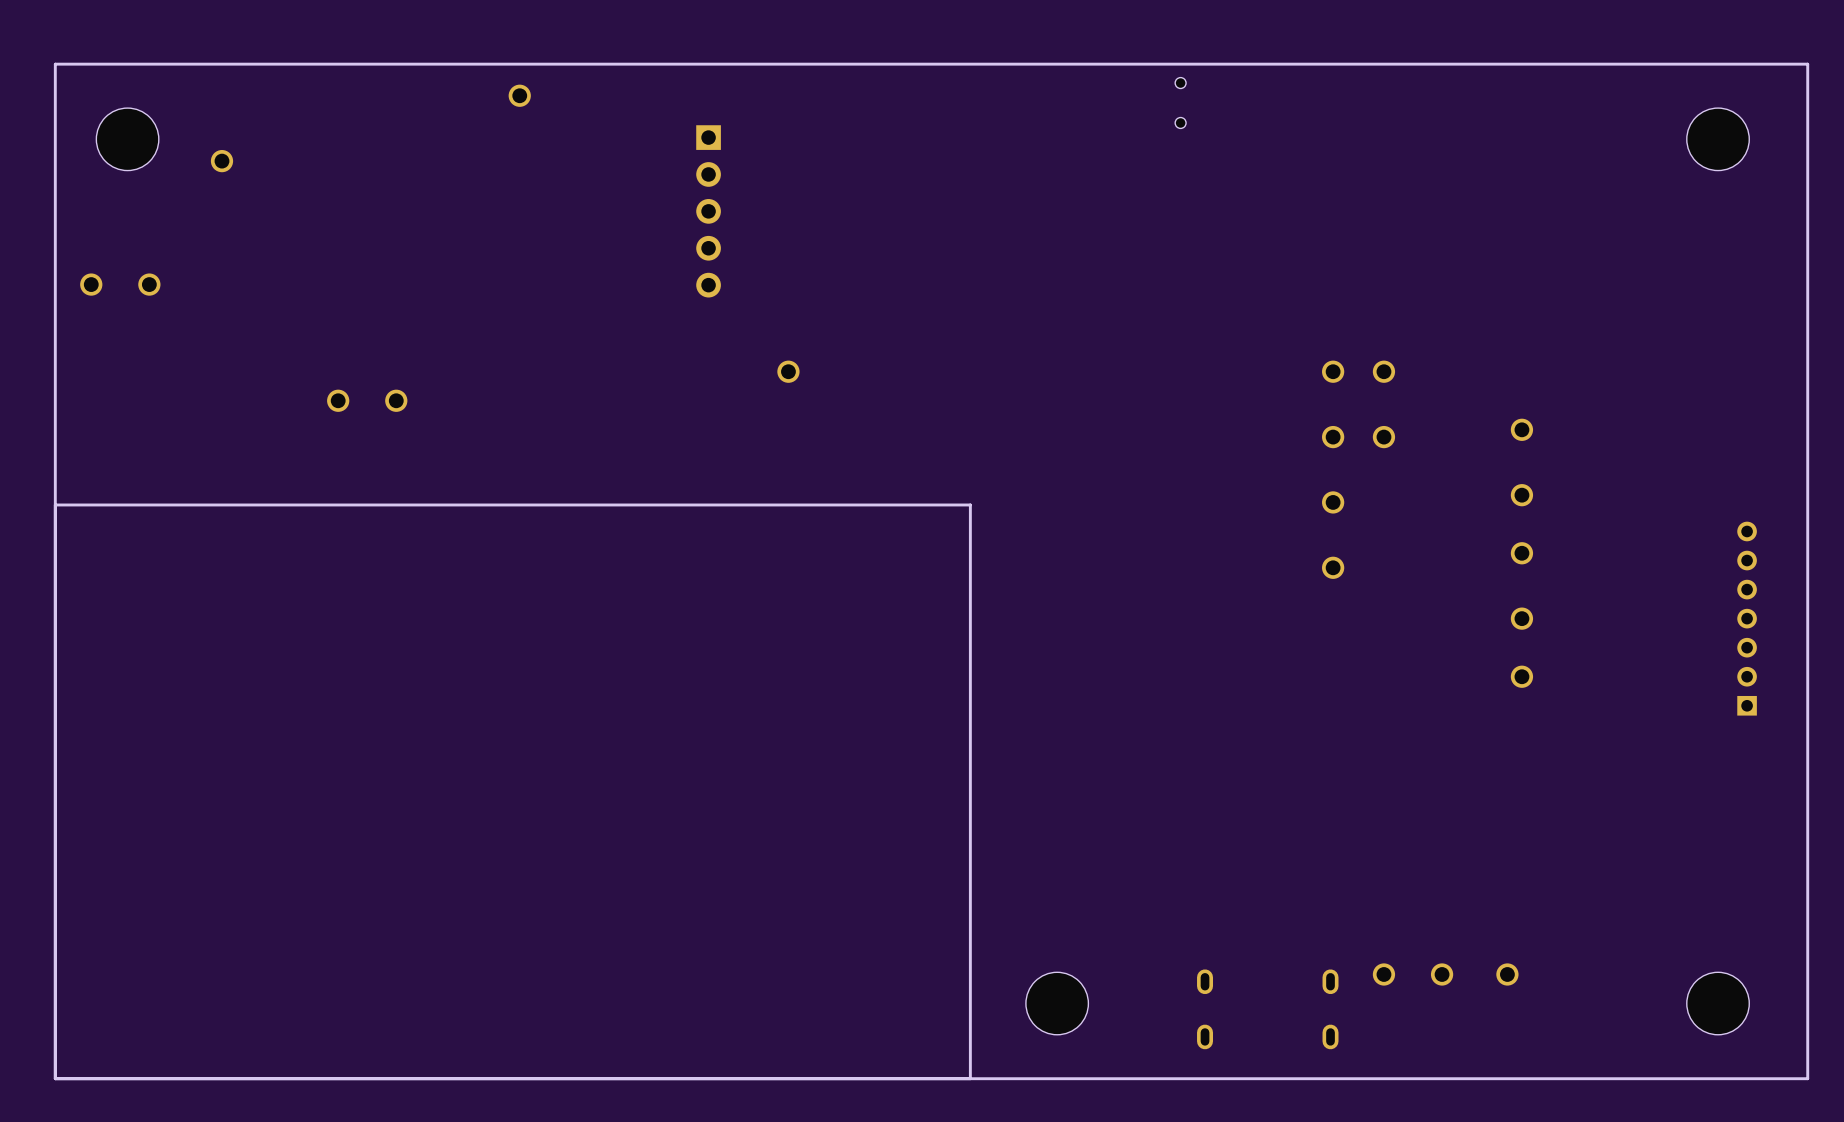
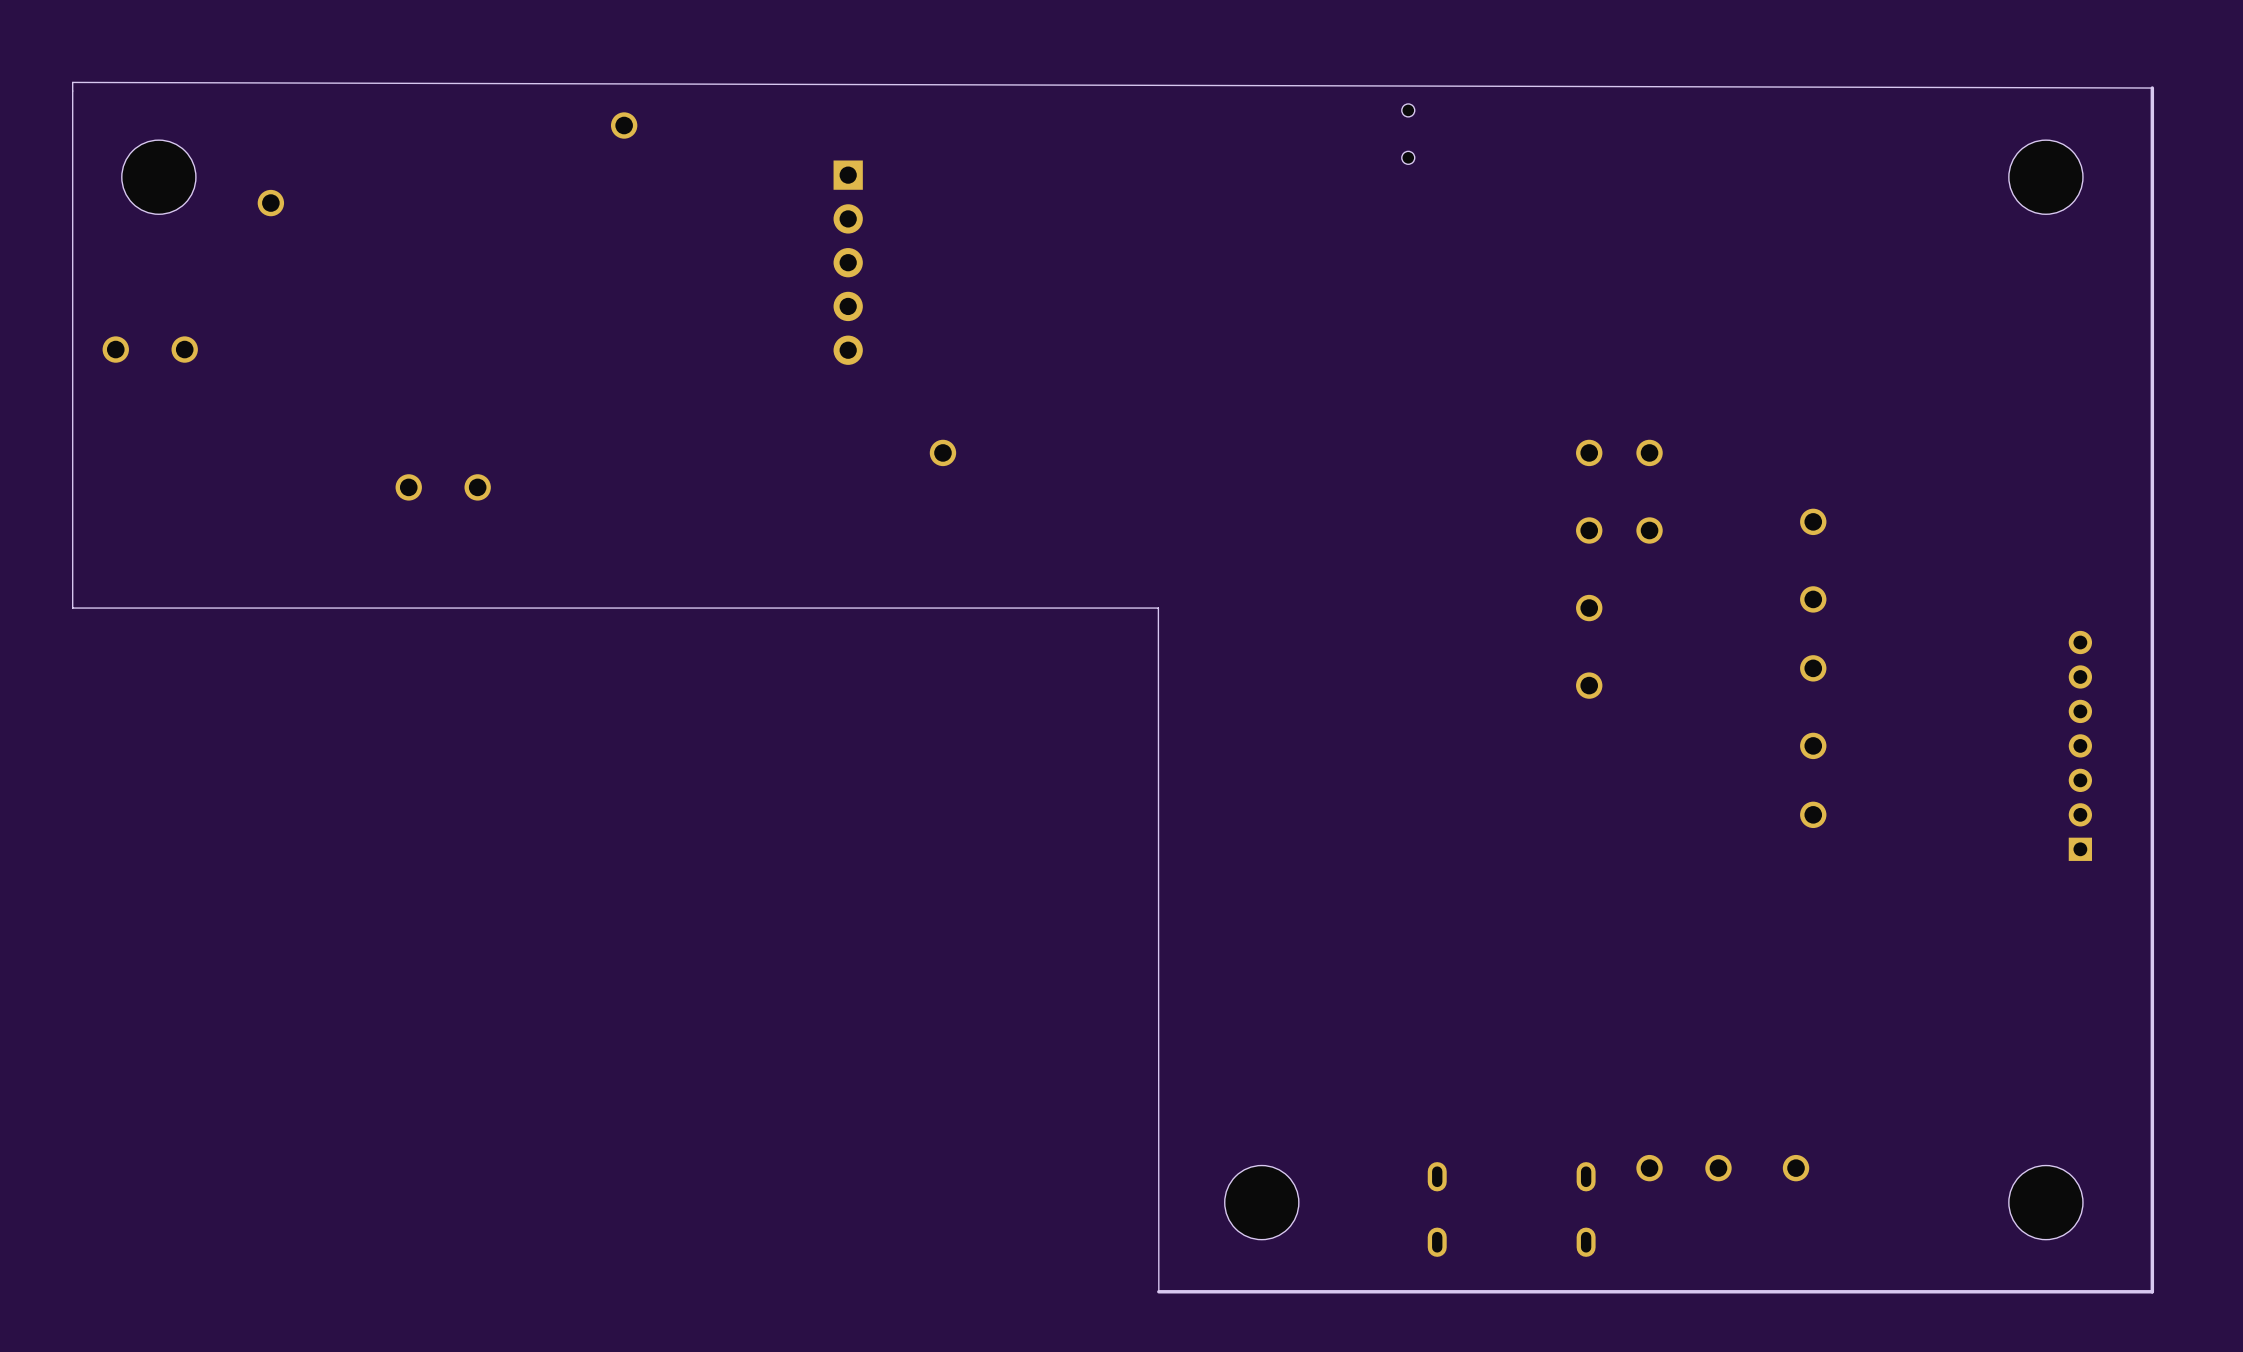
board edge: (1807, 64) (55, 64) (55, 1078) (970, 1078) (970, 504) (55, 504) -> (2152, 88) (72, 82) (72, 608) (1158, 608) (1158, 1291)

